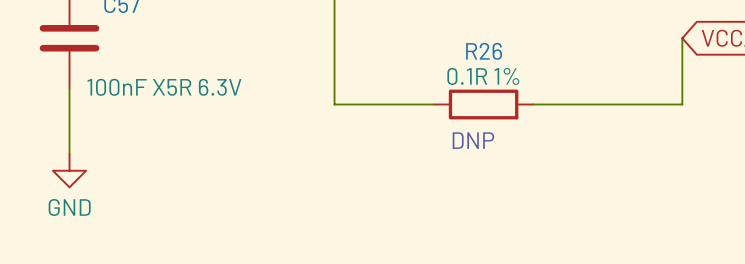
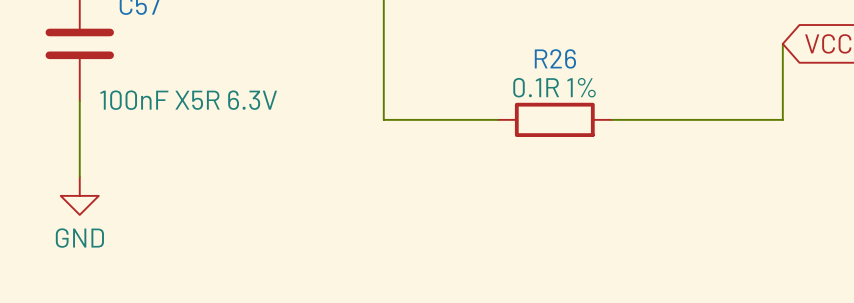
text: DNP (473, 140) -> none

